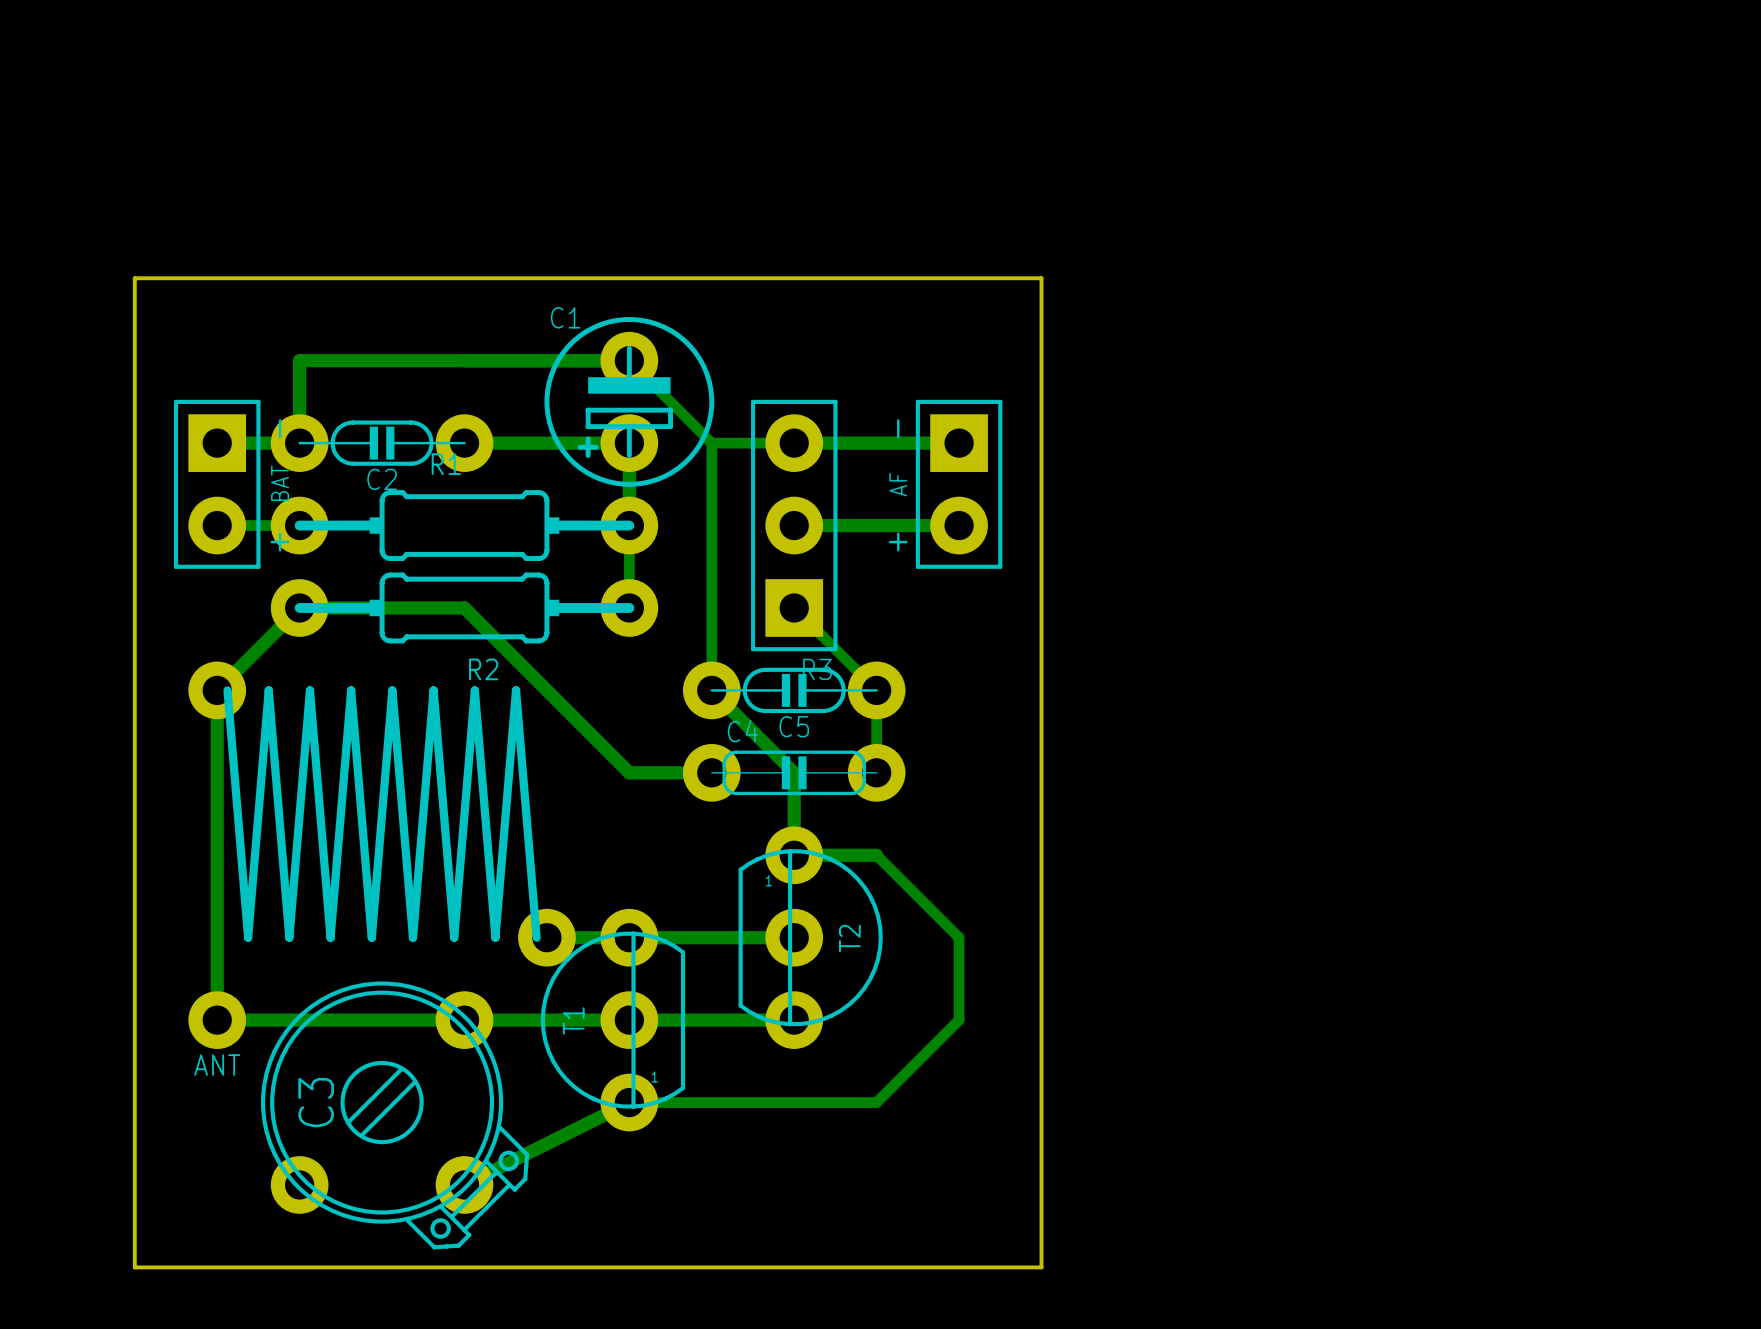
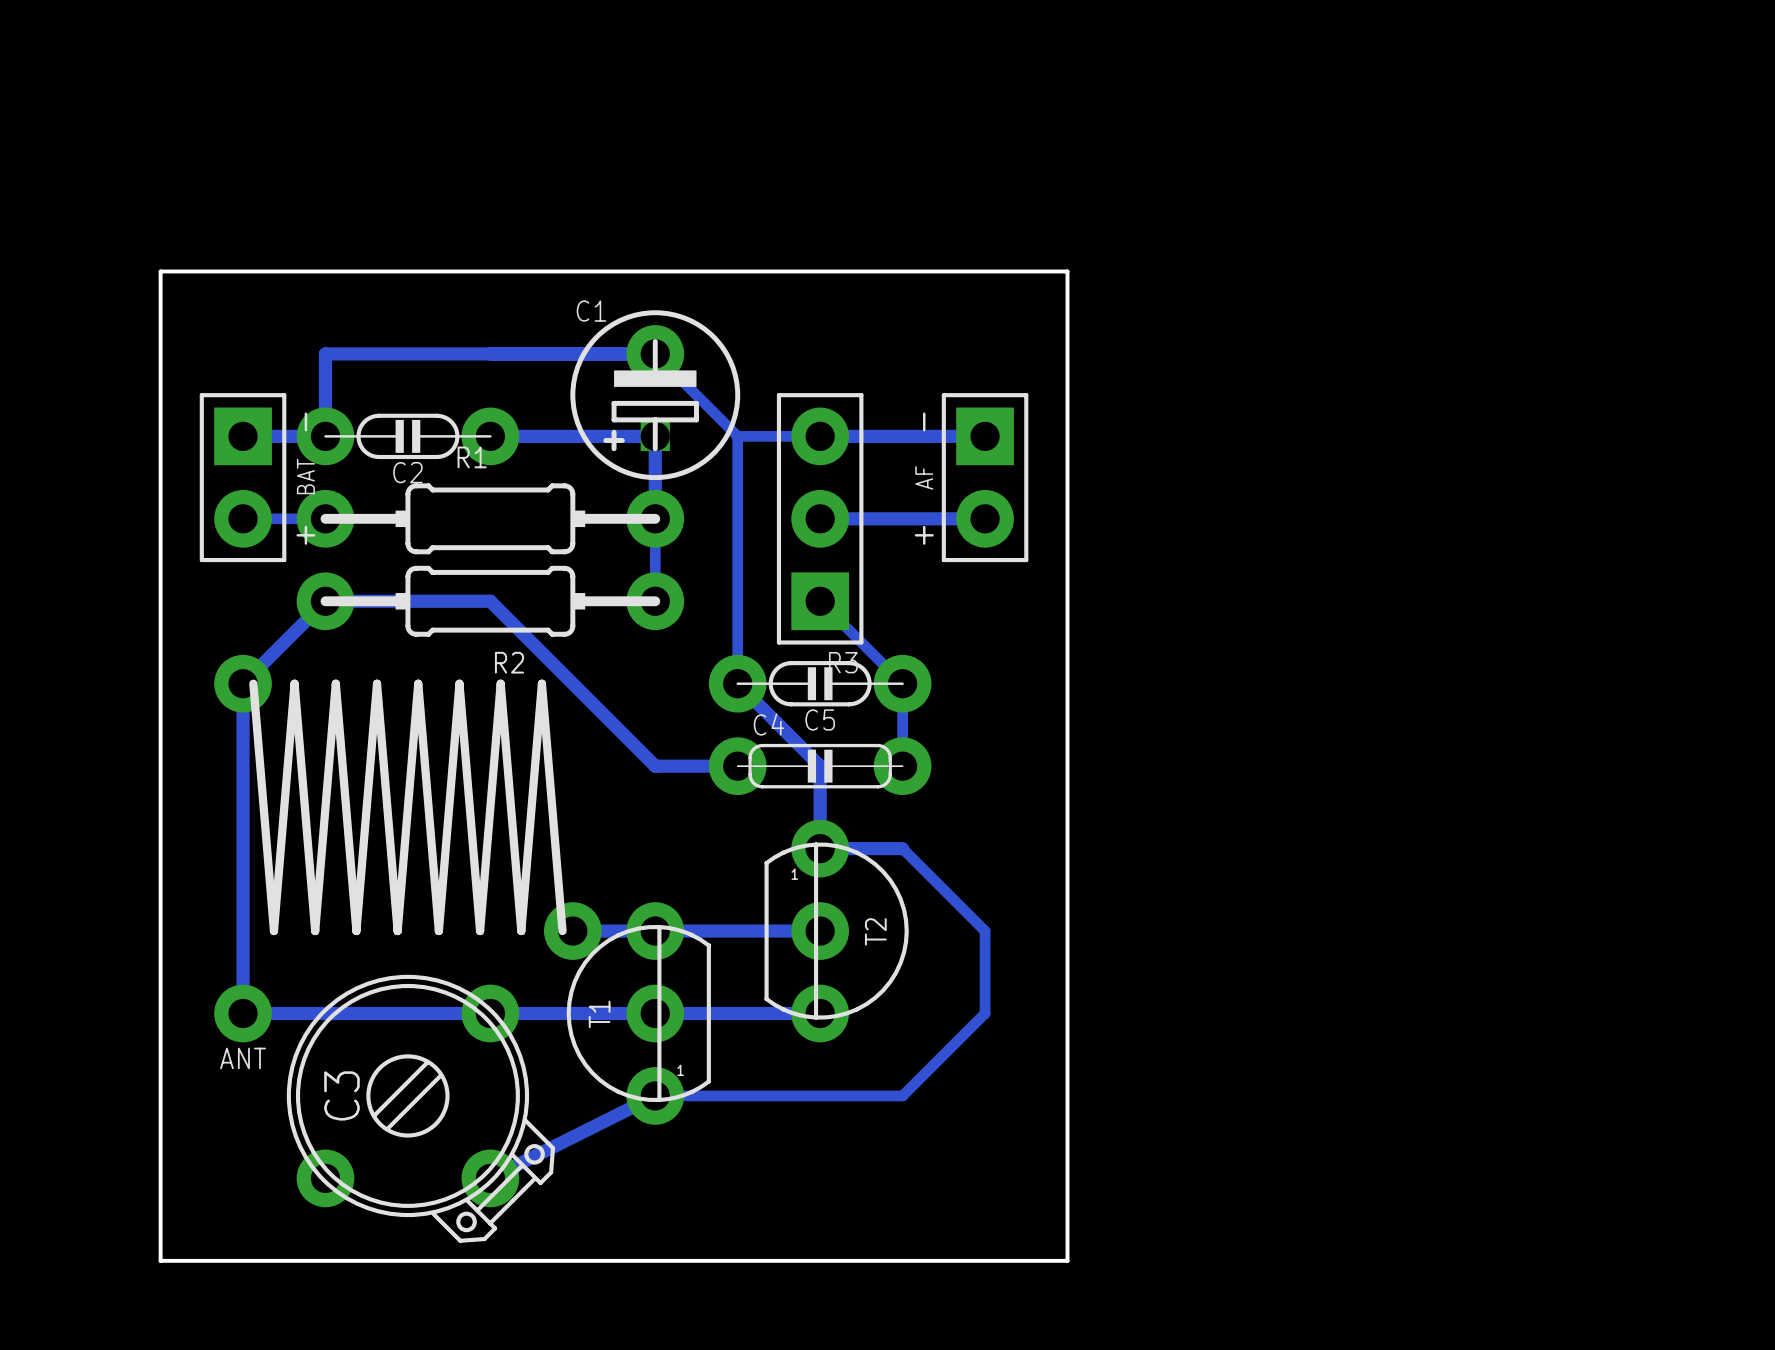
C1 footprint: [544, 317, 715, 487] -> [570, 310, 741, 481]

